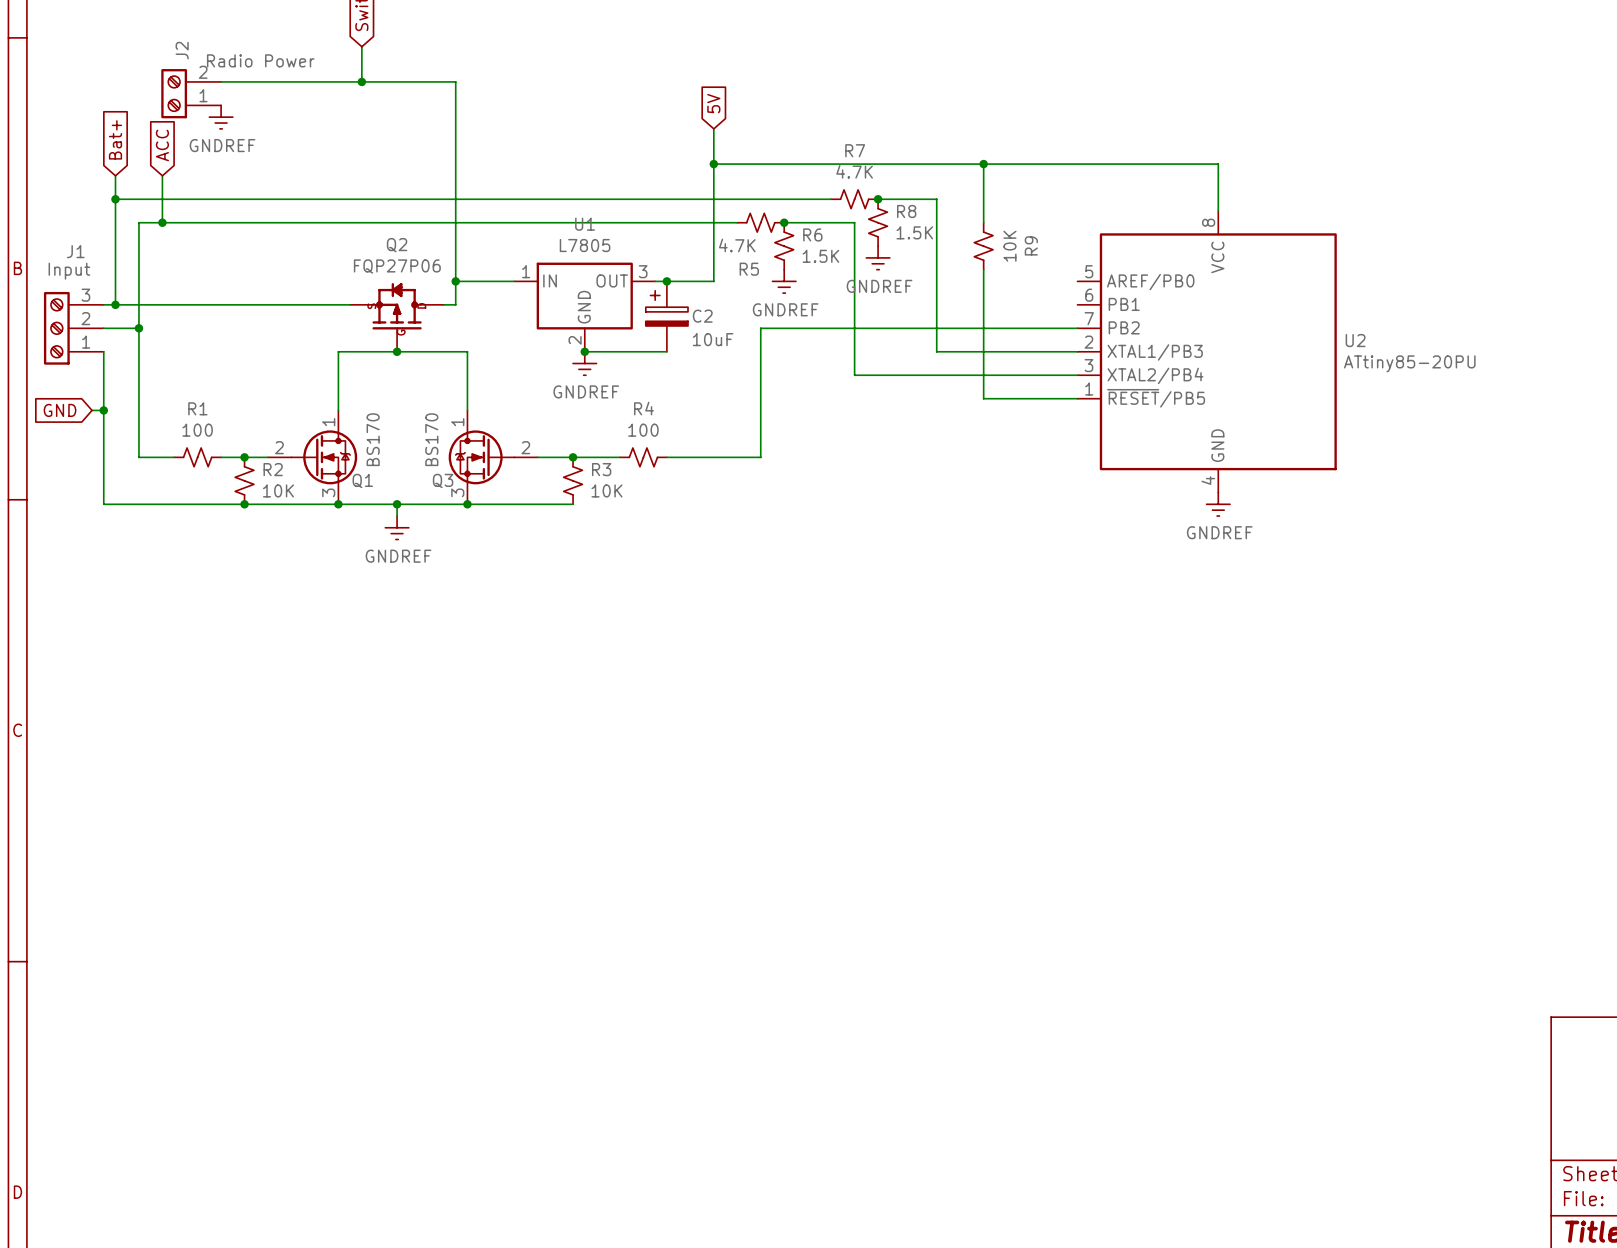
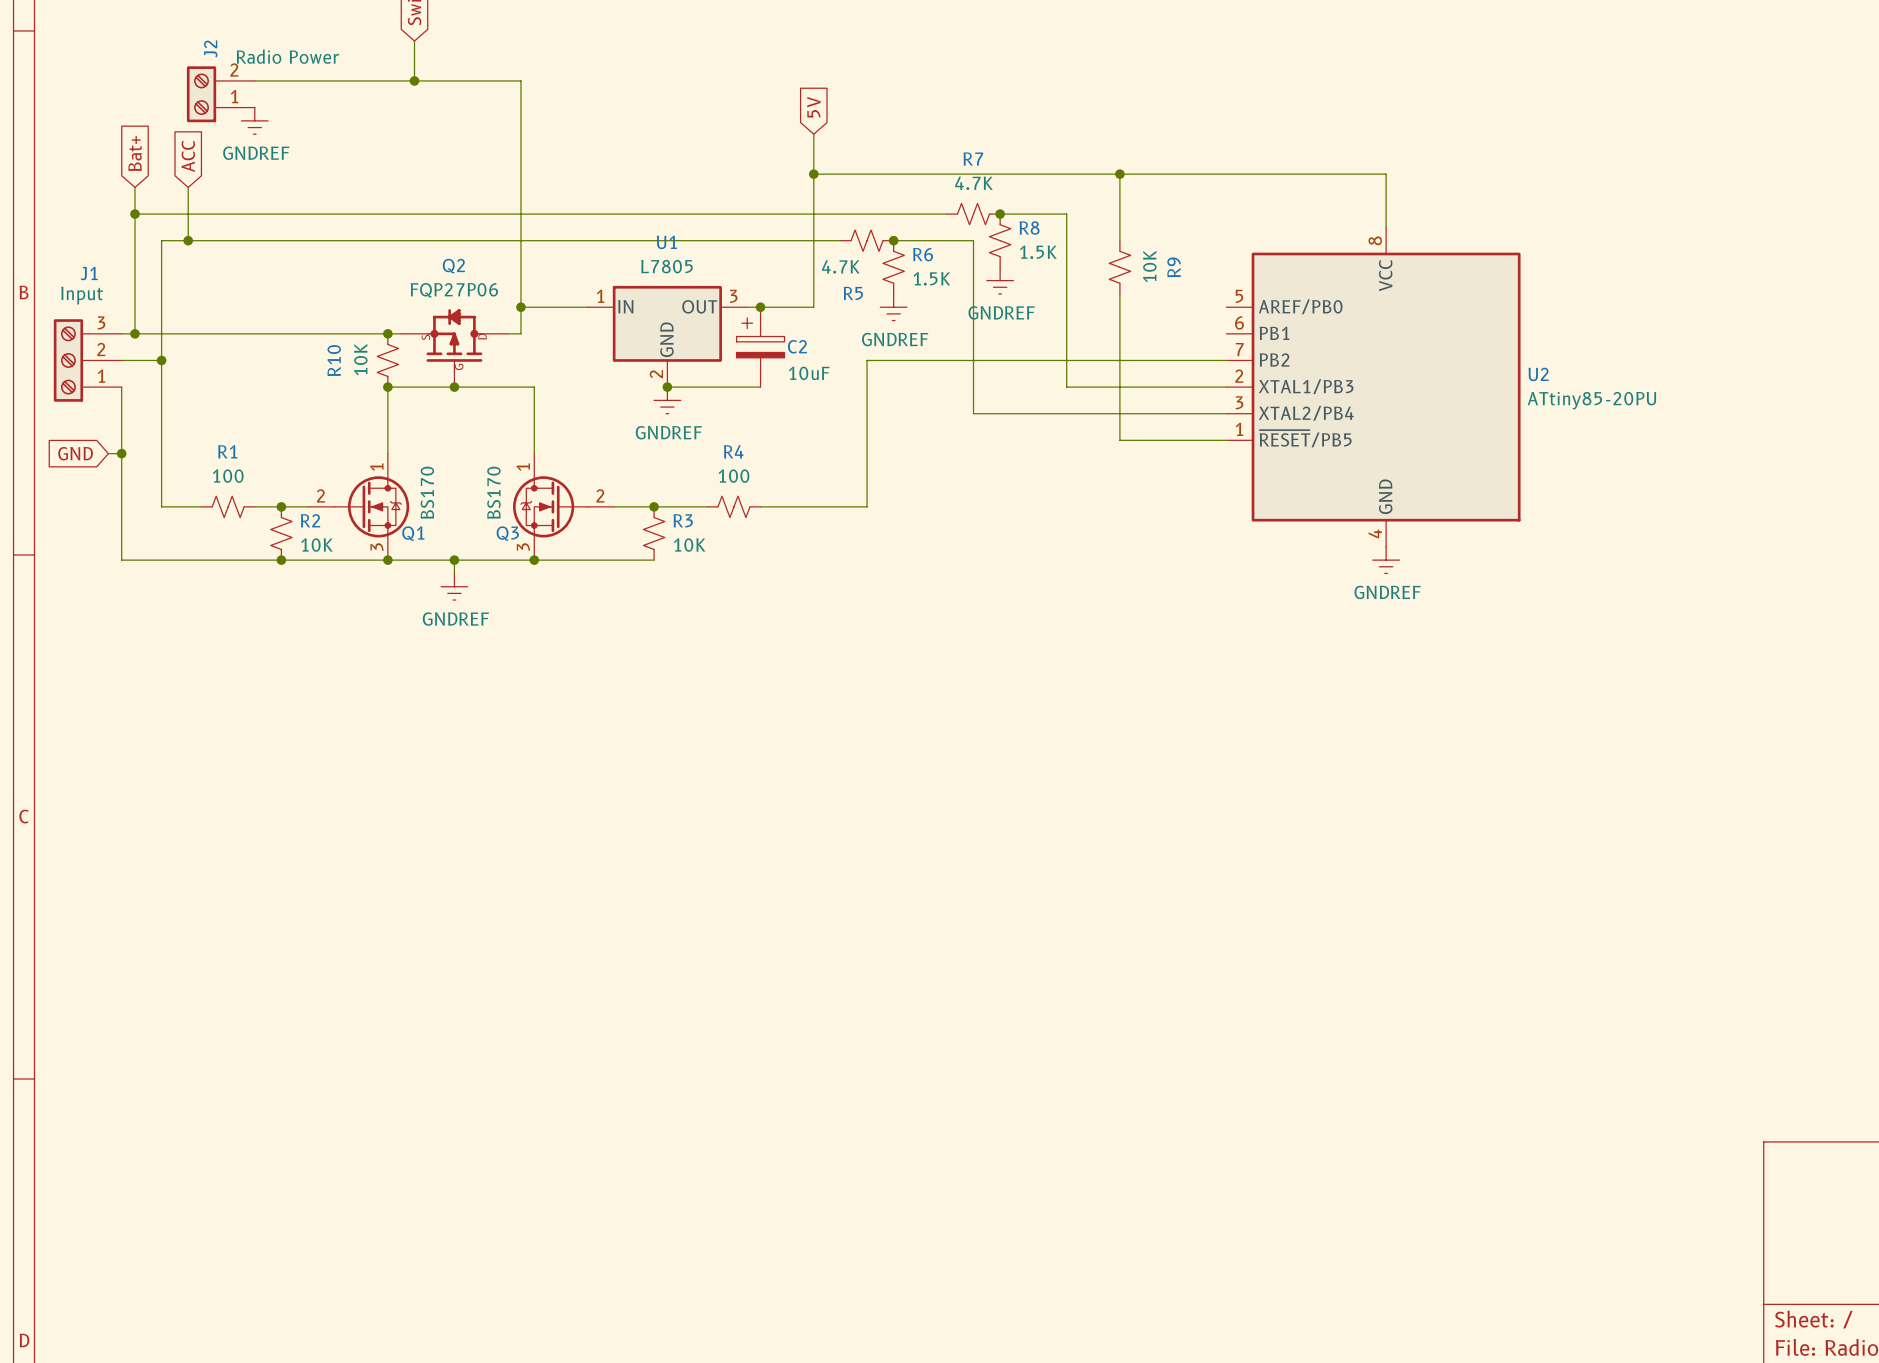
junction: none -> (387, 333)
R10: none -> 10K (387, 360)
junction: none -> (387, 387)

